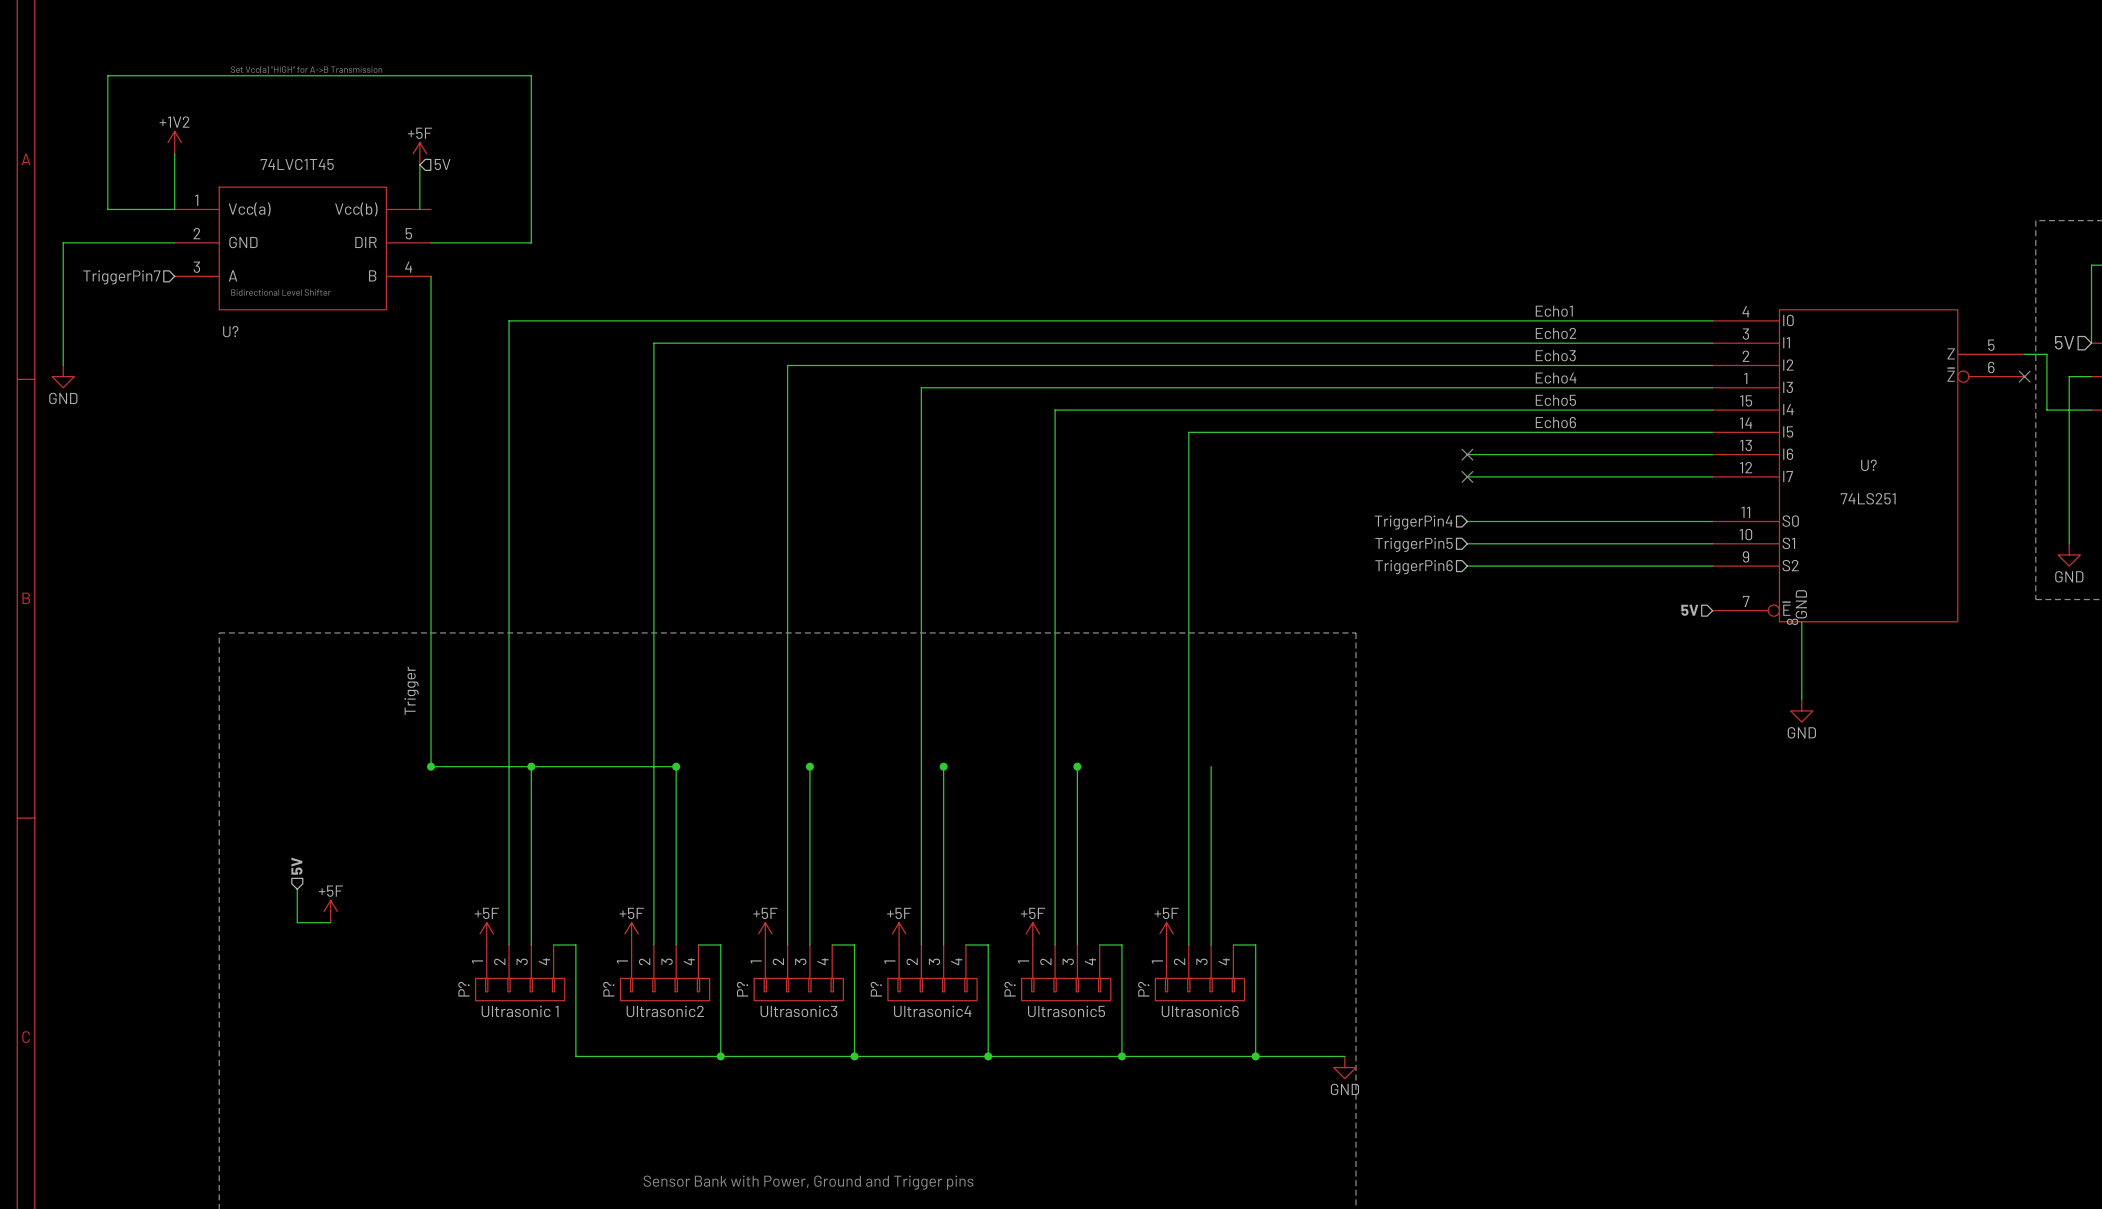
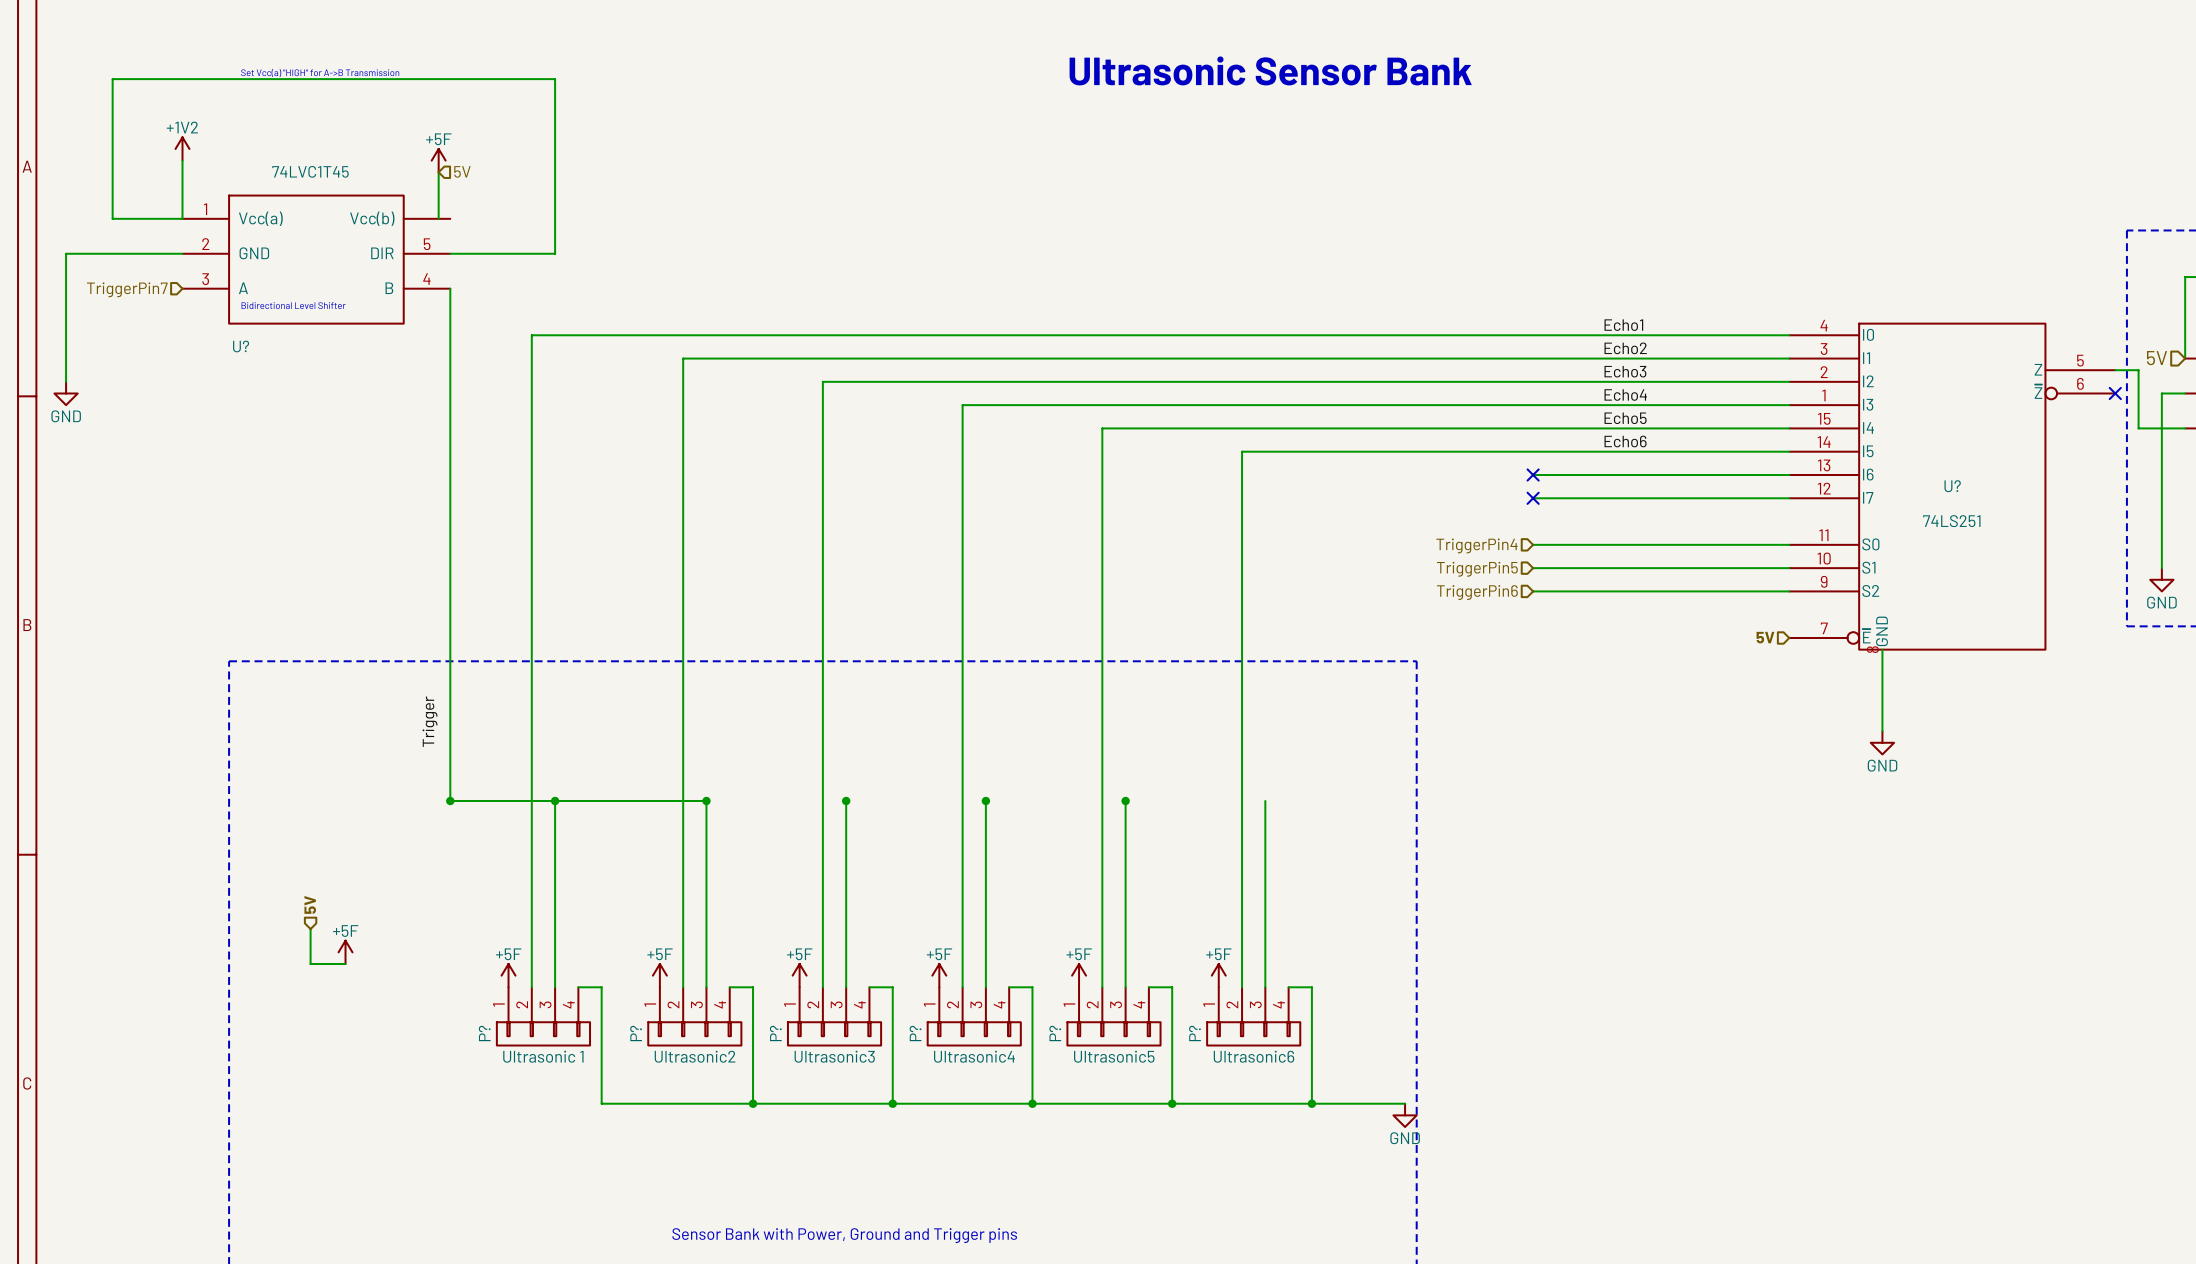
text: none -> Ultrasonic Sensor Bank (1270, 70)

